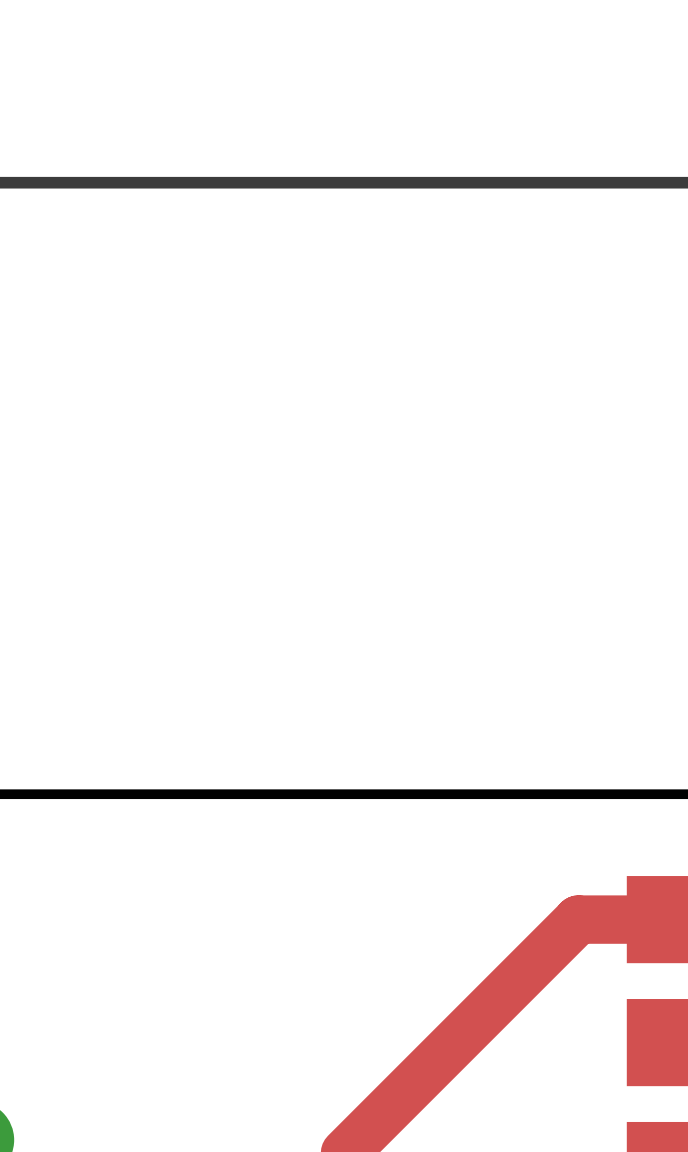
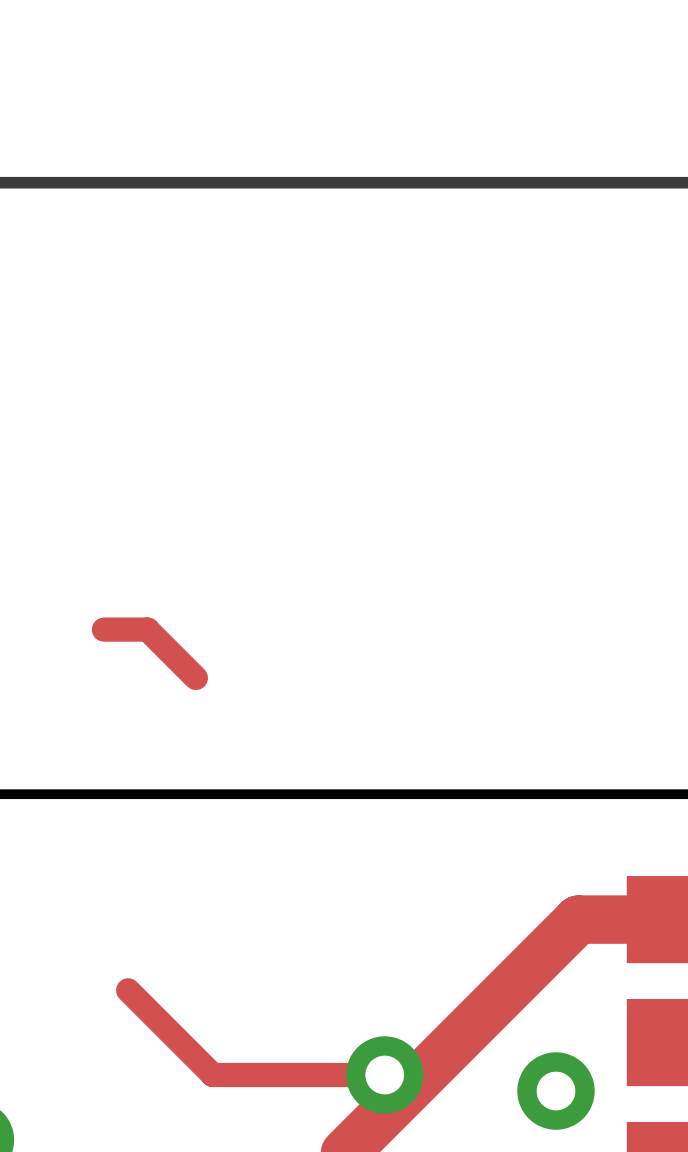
track: none -> (103, 629) (147, 629) (195, 678)
track: none -> (128, 990) (212, 1075) (384, 1075)
via: none -> (384, 1075)
via: none -> (555, 1091)

